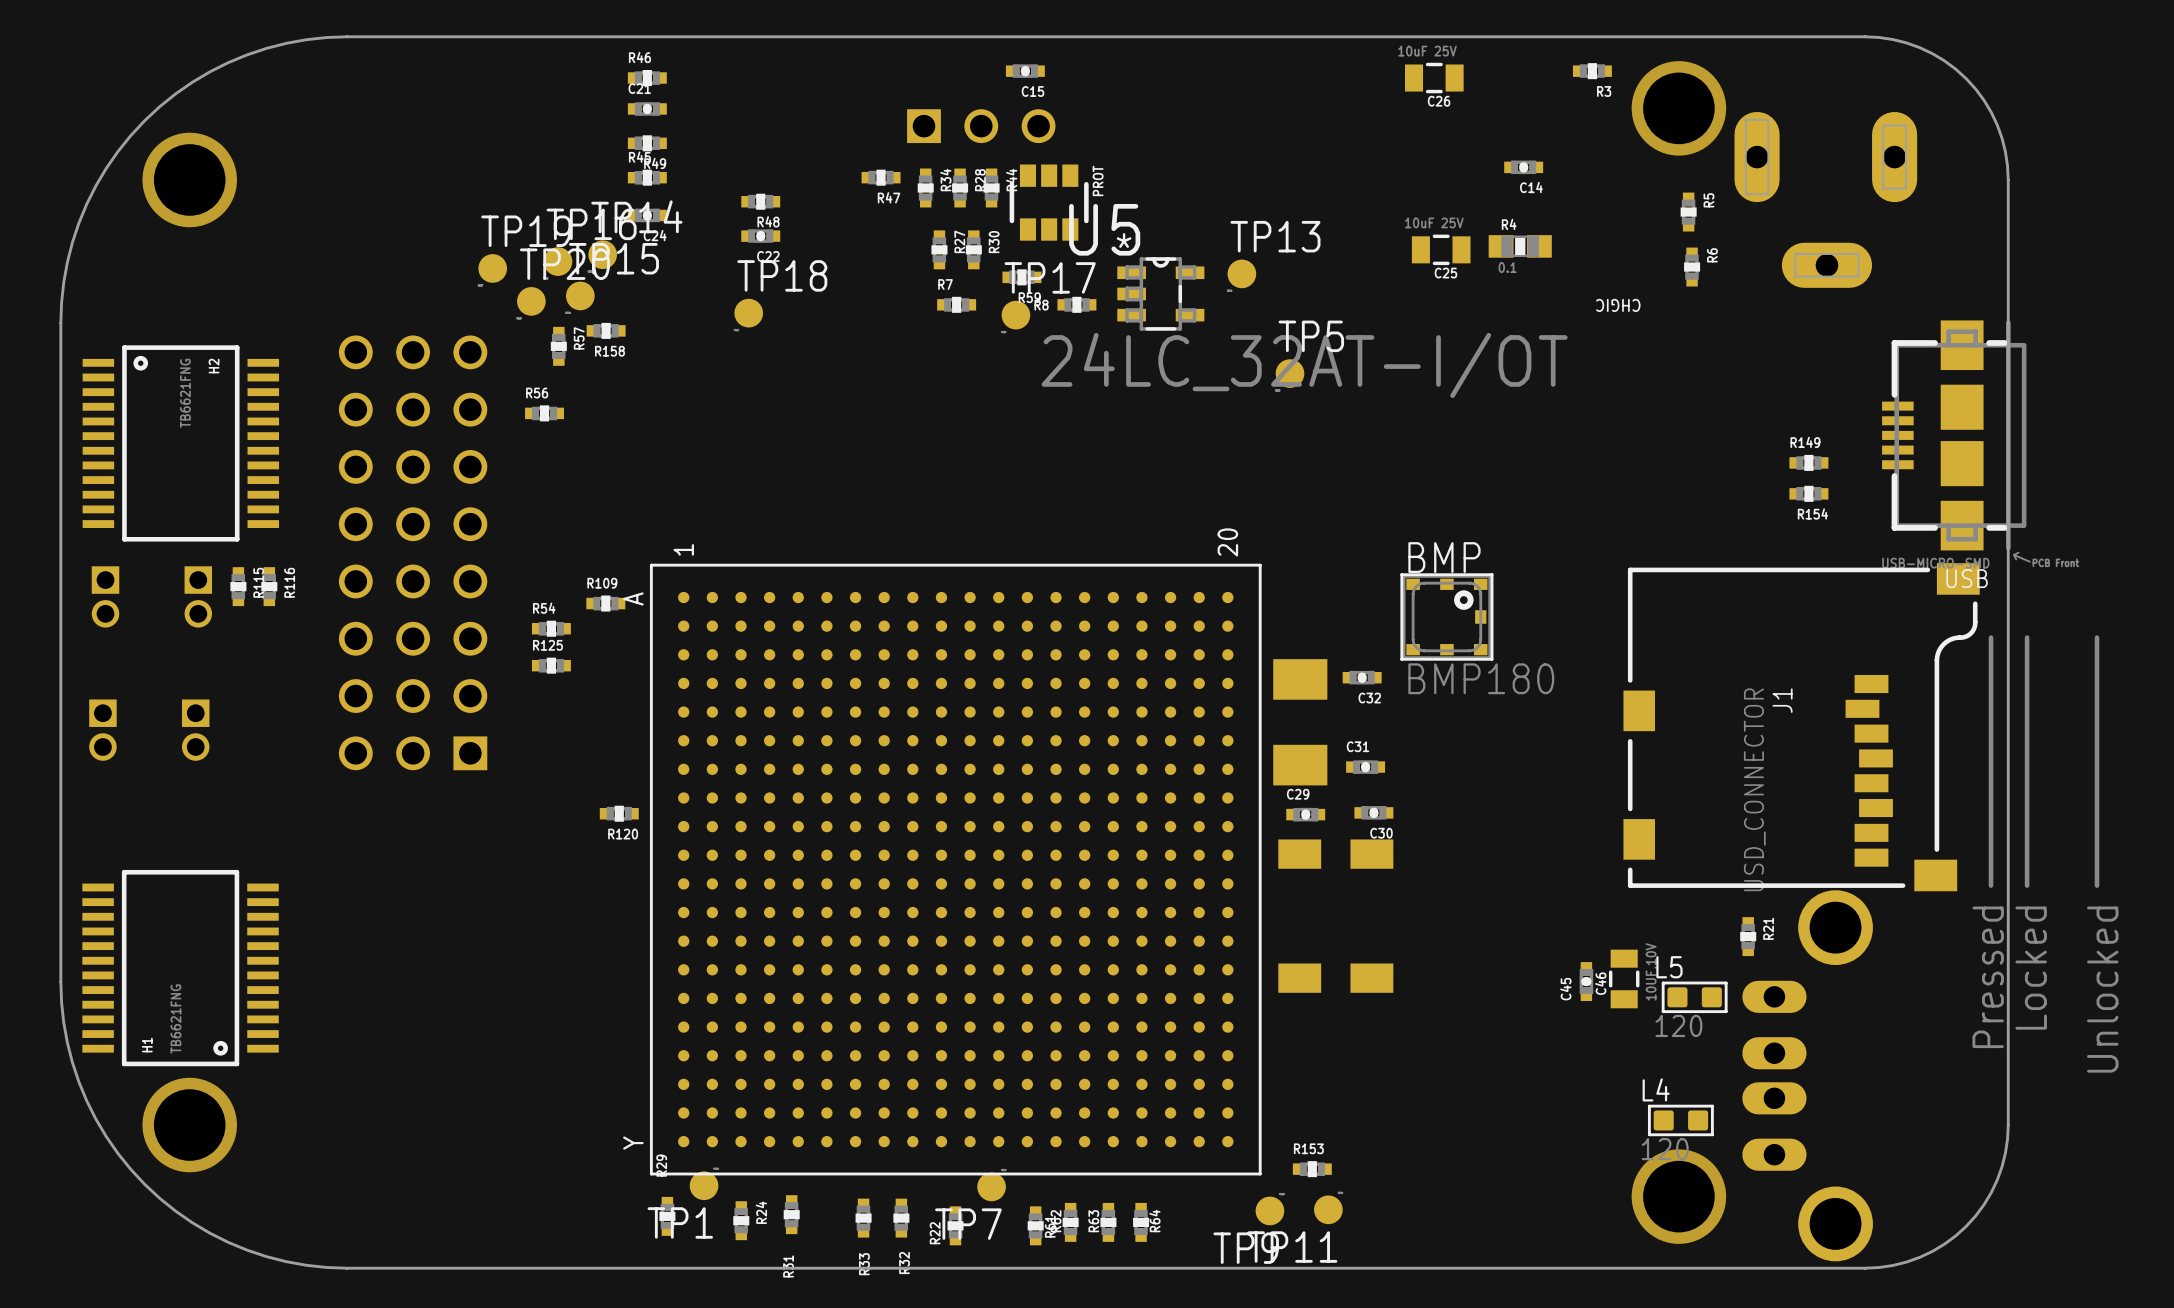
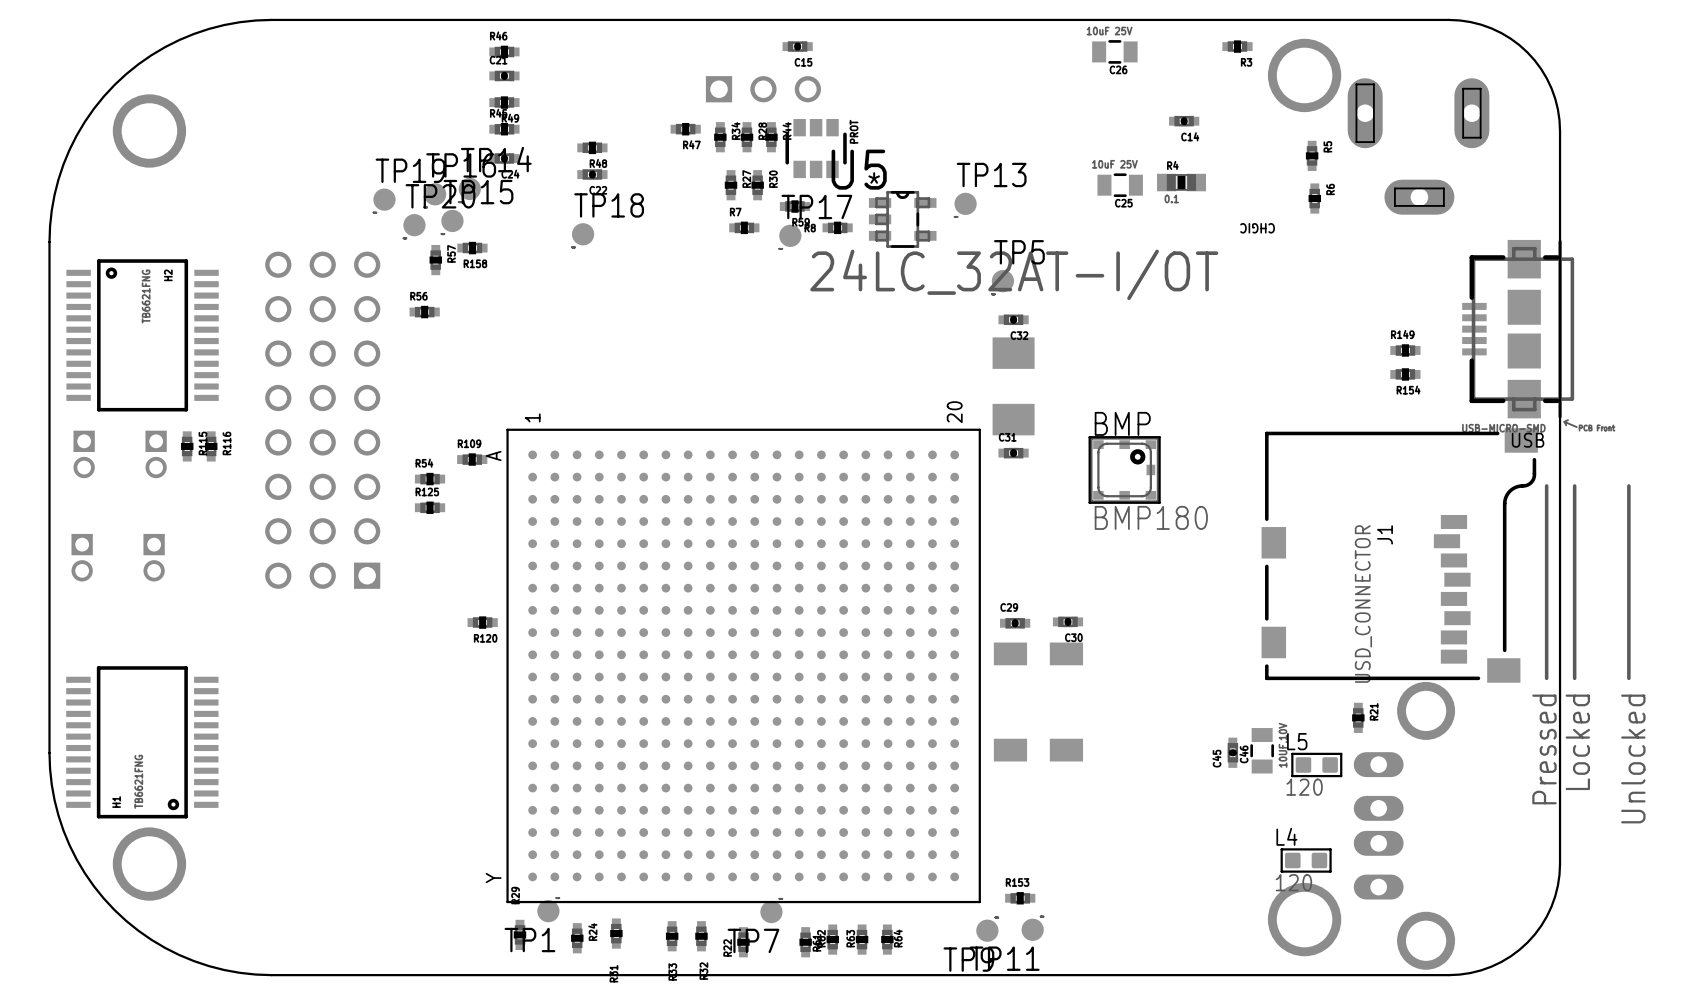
C32 position: (1362, 677) -> (1013, 319)
part position: (1300, 722) -> (1013, 386)
C31 position: (1365, 767) -> (1013, 453)

